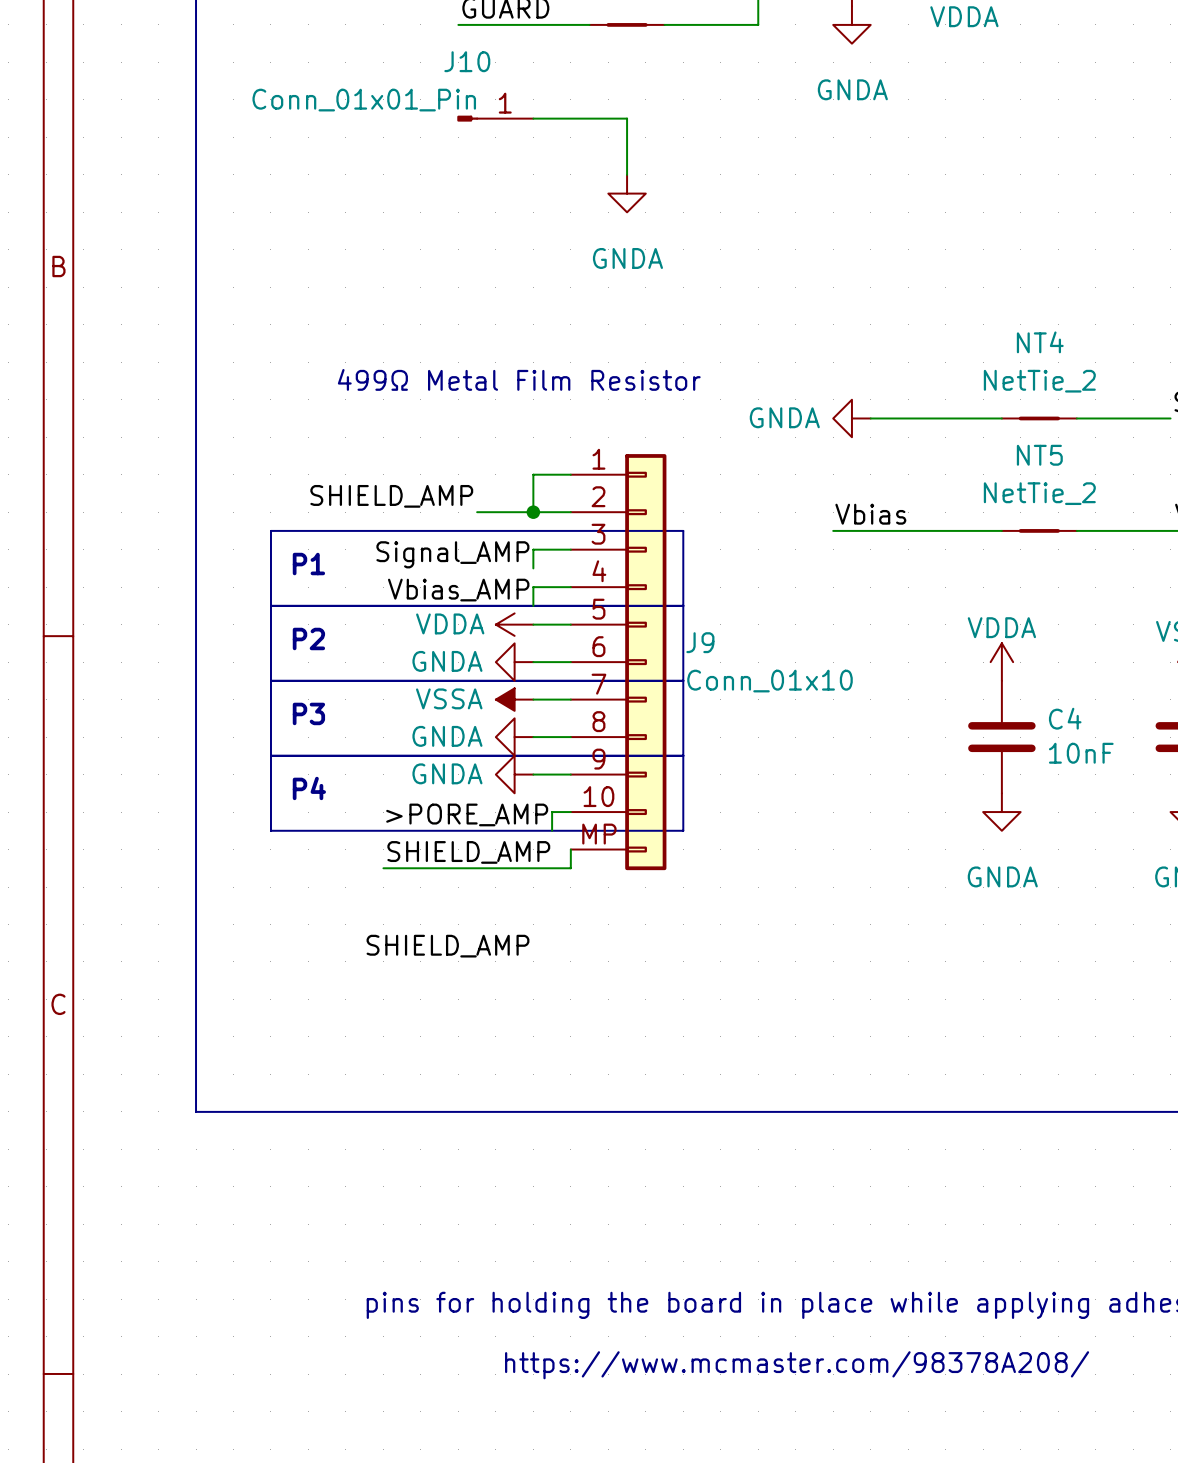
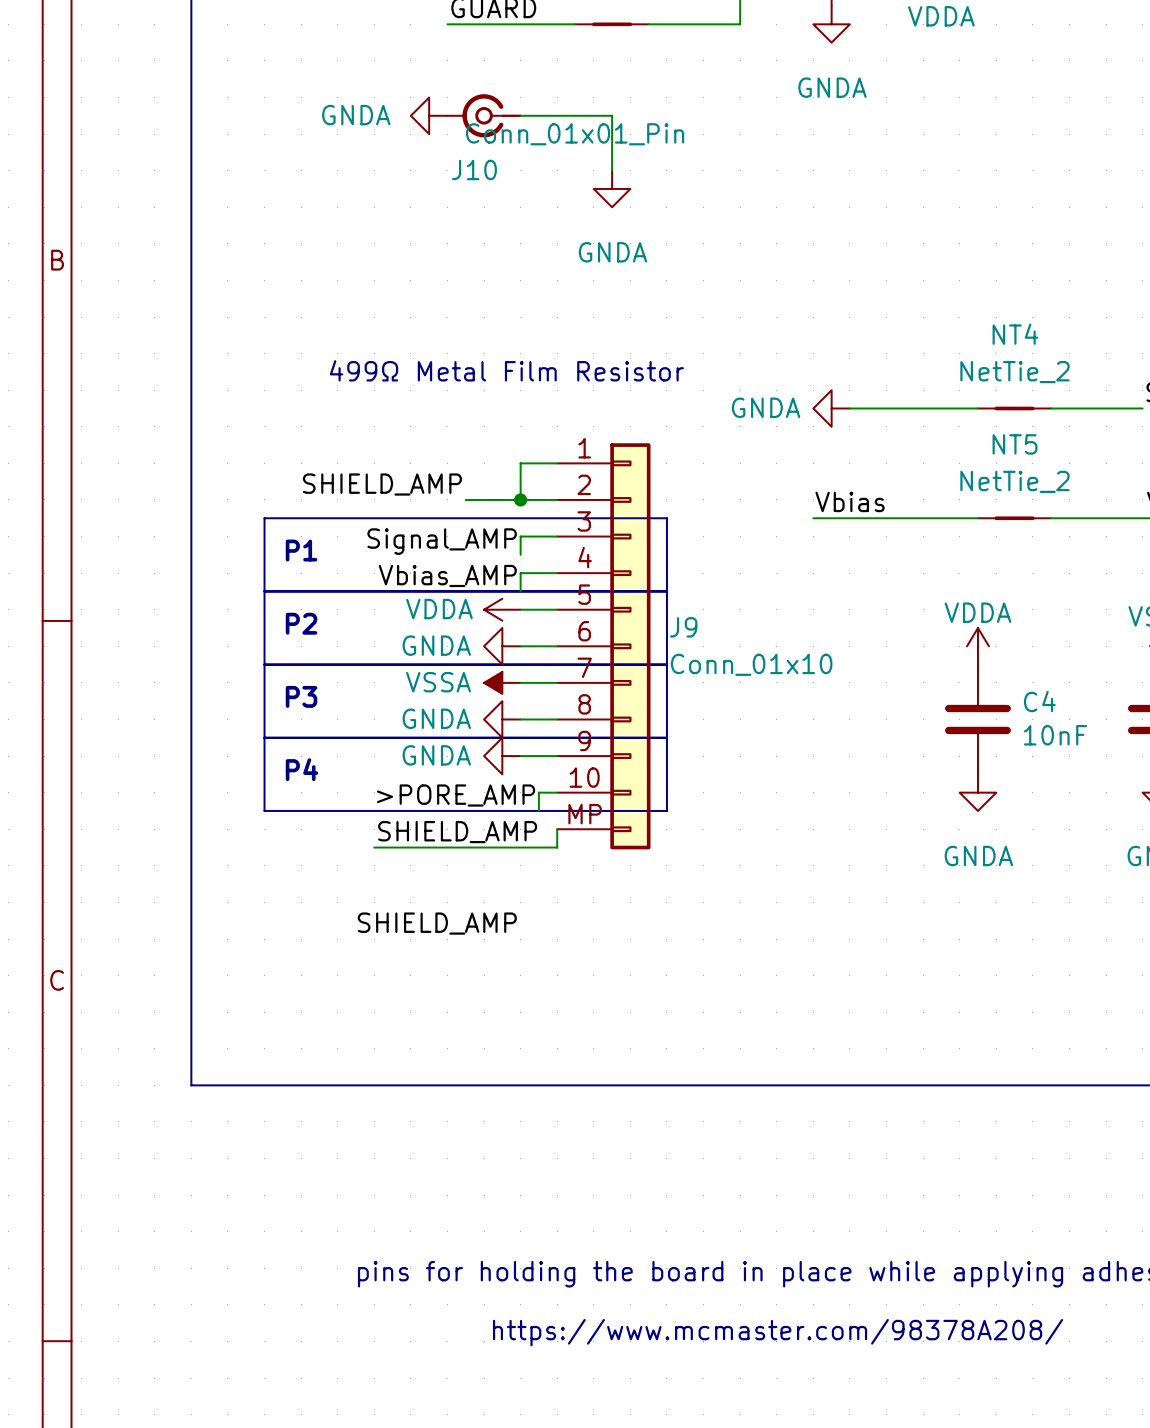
J10 name position: J10 (467, 61) -> J10 (474, 169)
J10 value position: Conn_01x01_Pin (364, 100) -> Conn_01x01_Pin (575, 134)
J10 symbol: [457, 115, 534, 122] -> [447, 94, 521, 138]
power symbol: none -> GNDA (429, 115)

